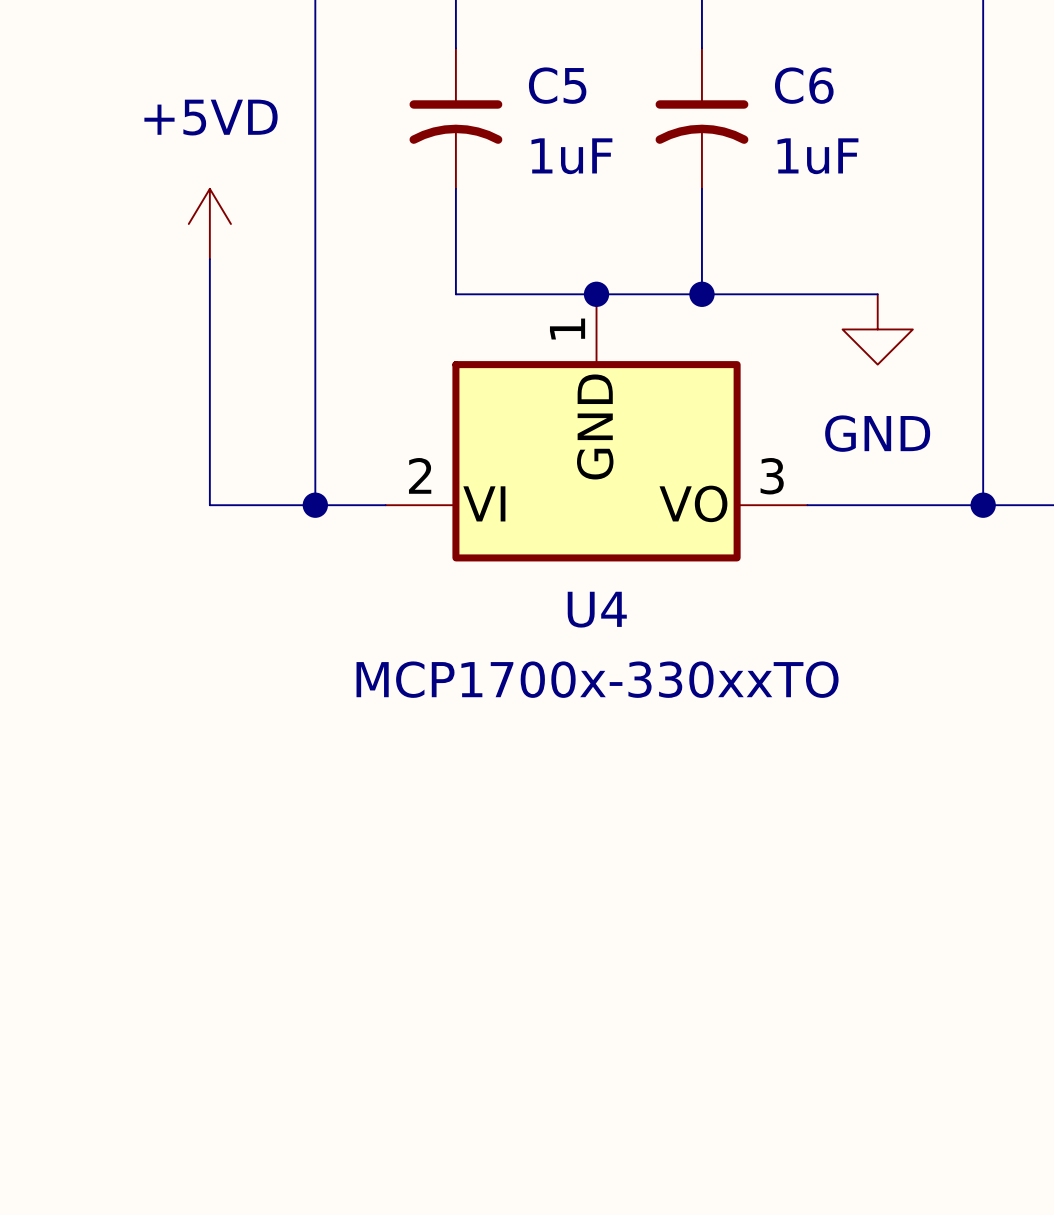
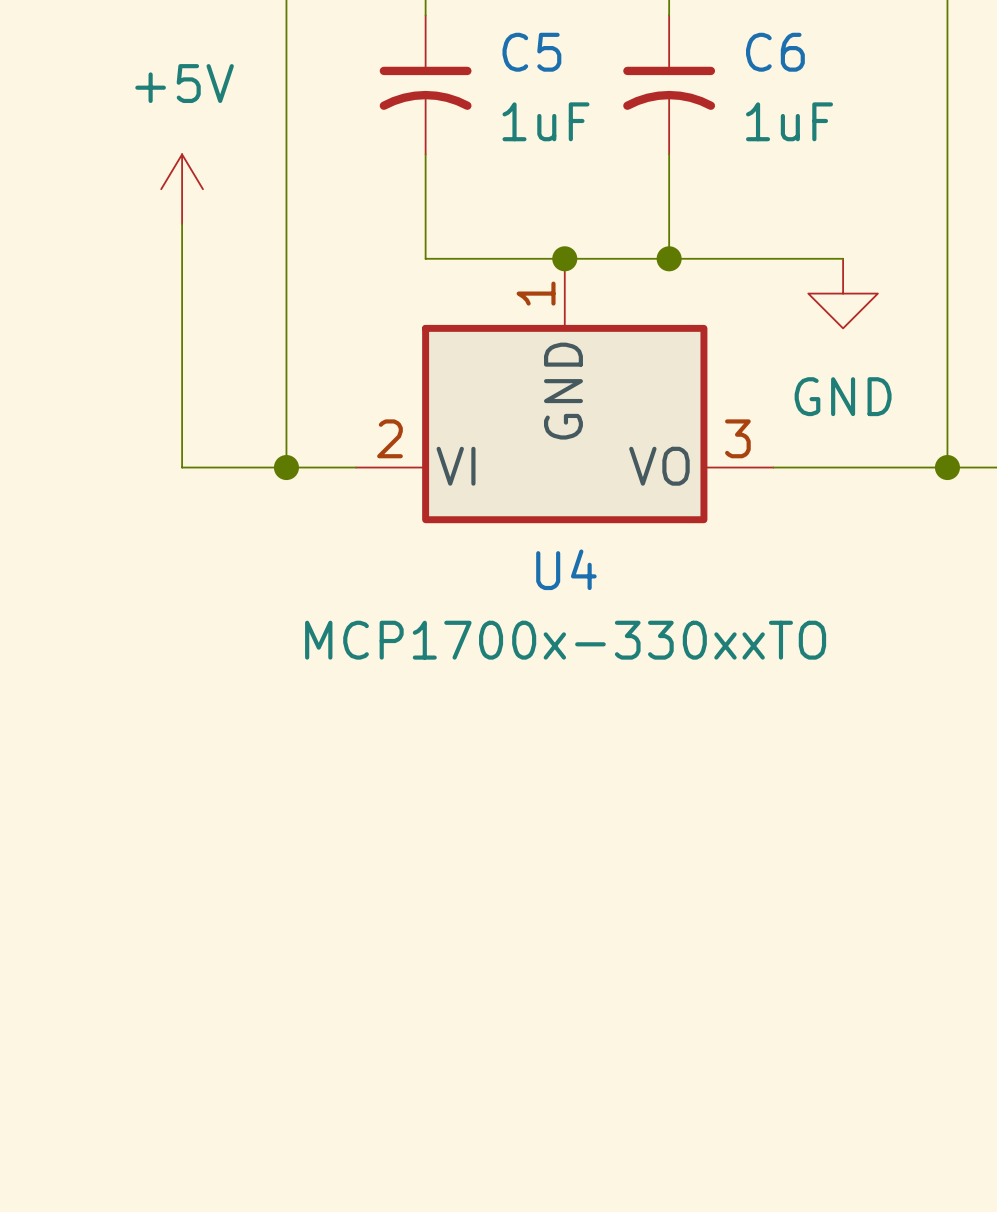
power symbol: +5VD (209, 224) -> +5V (182, 189)

